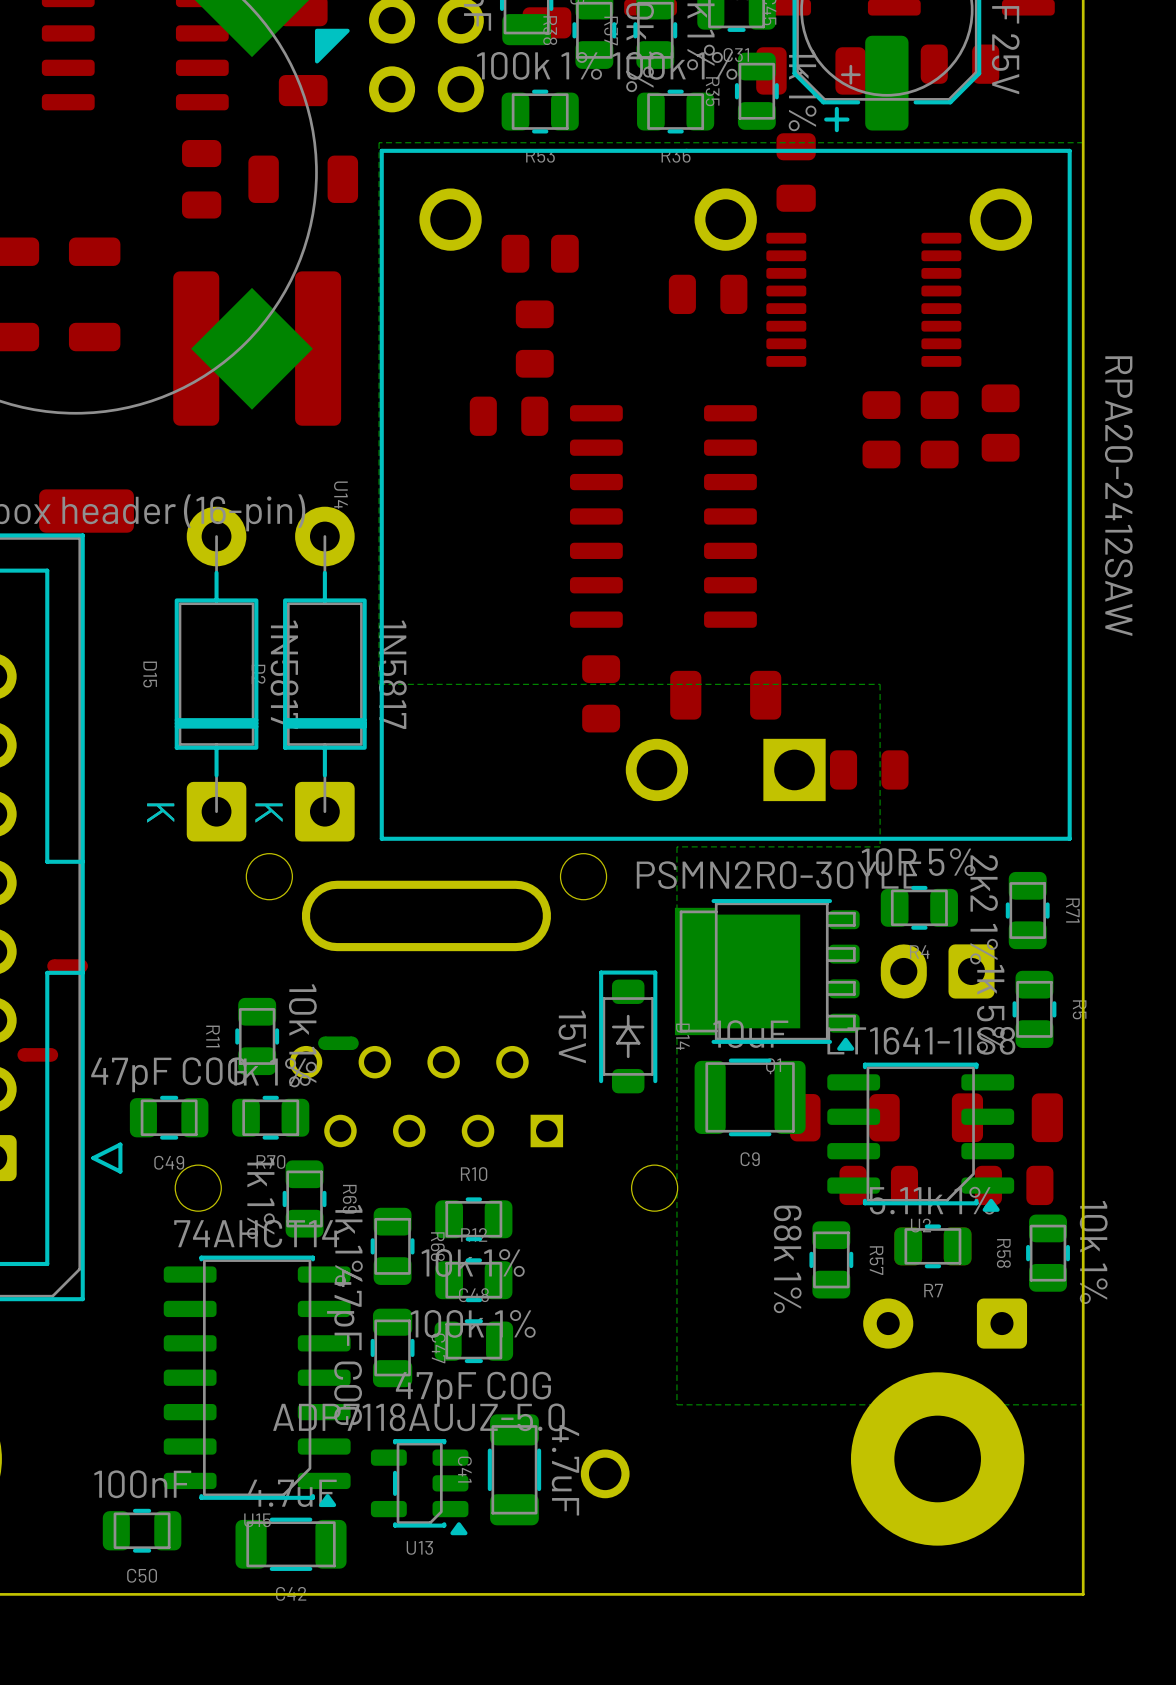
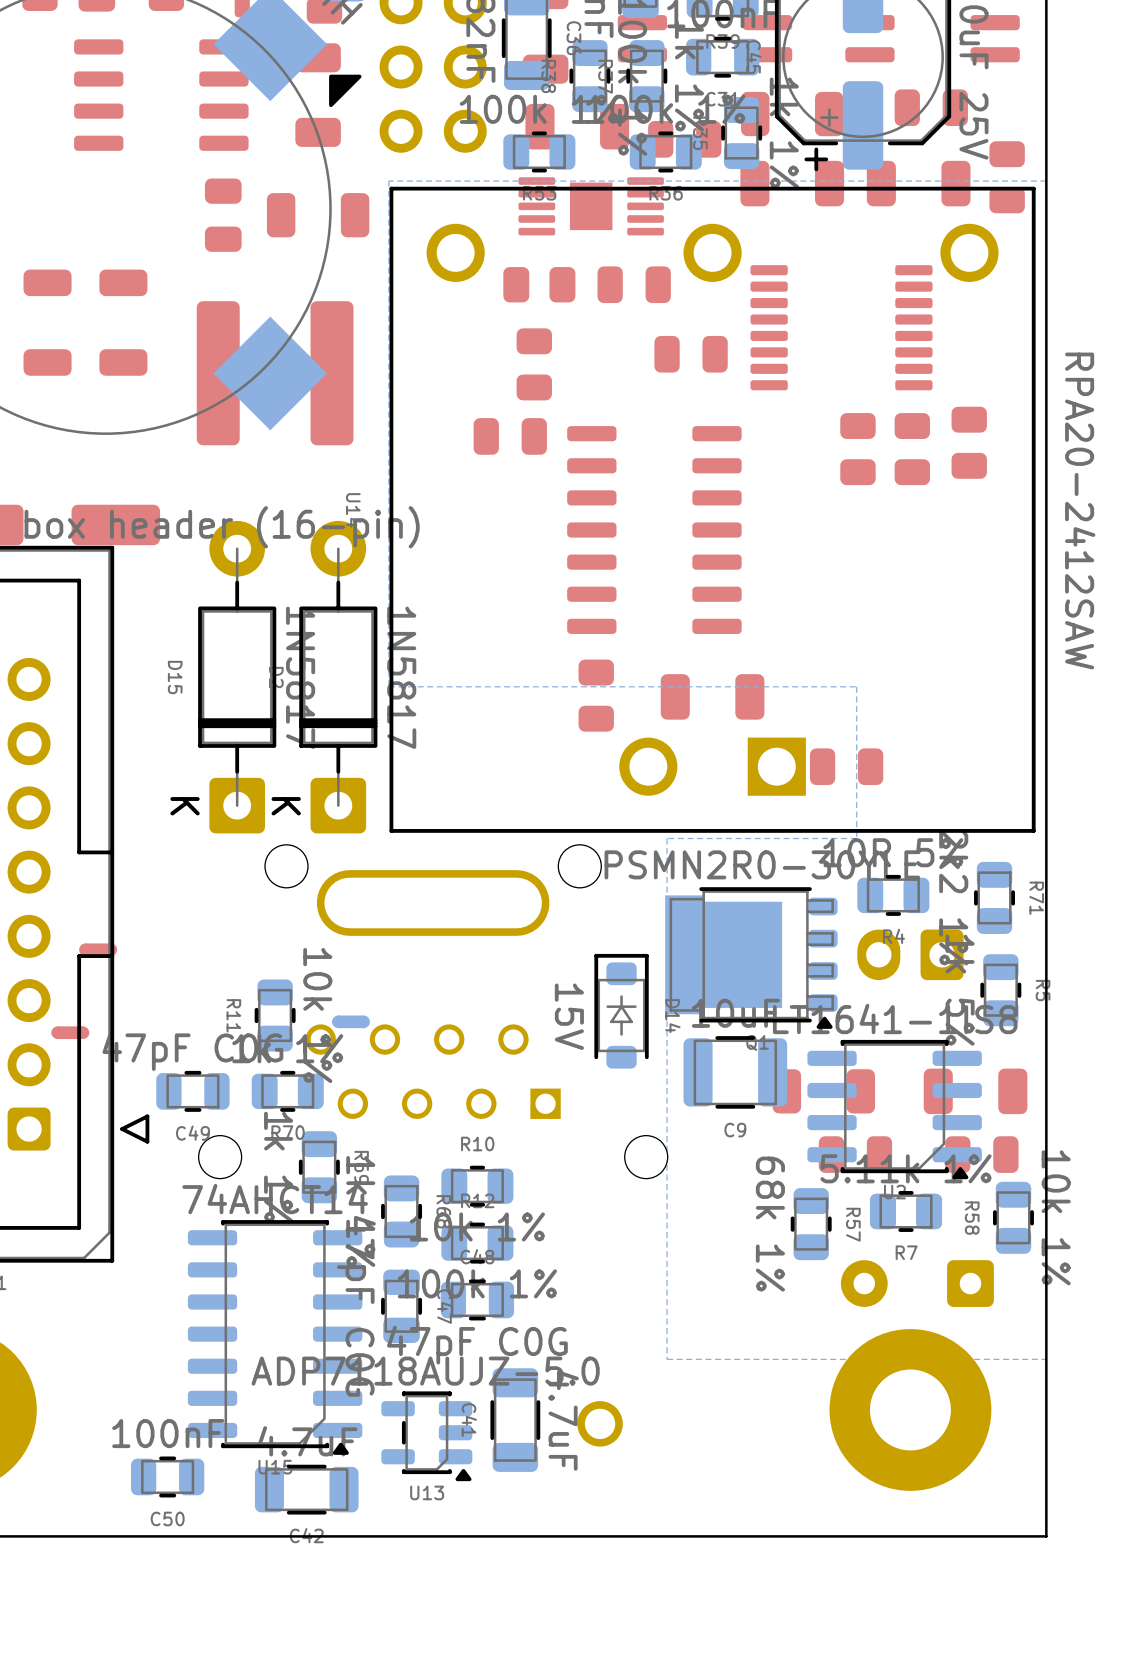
part: none -> (577, 126)
part: none -> (684, 139)
part: none -> (1007, 177)
part: none -> (792, 183)
part: none -> (918, 183)
part: none -> (591, 206)
part: (796, 172) -> none
part: none -> (634, 284)
part position: (708, 294) -> (691, 354)

